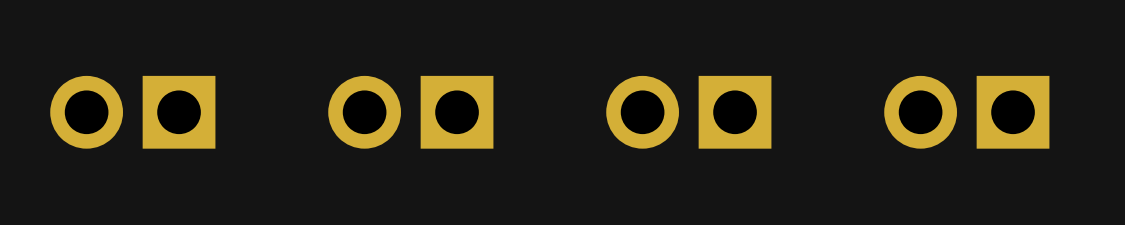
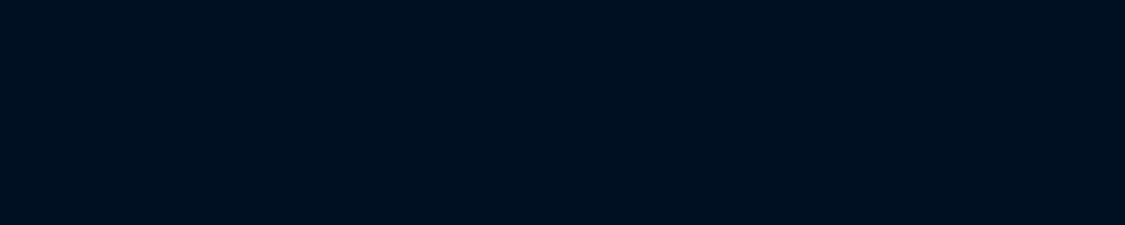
part: (132, 112) -> none
part: (410, 112) -> none
part: (688, 112) -> none
part: (966, 112) -> none

